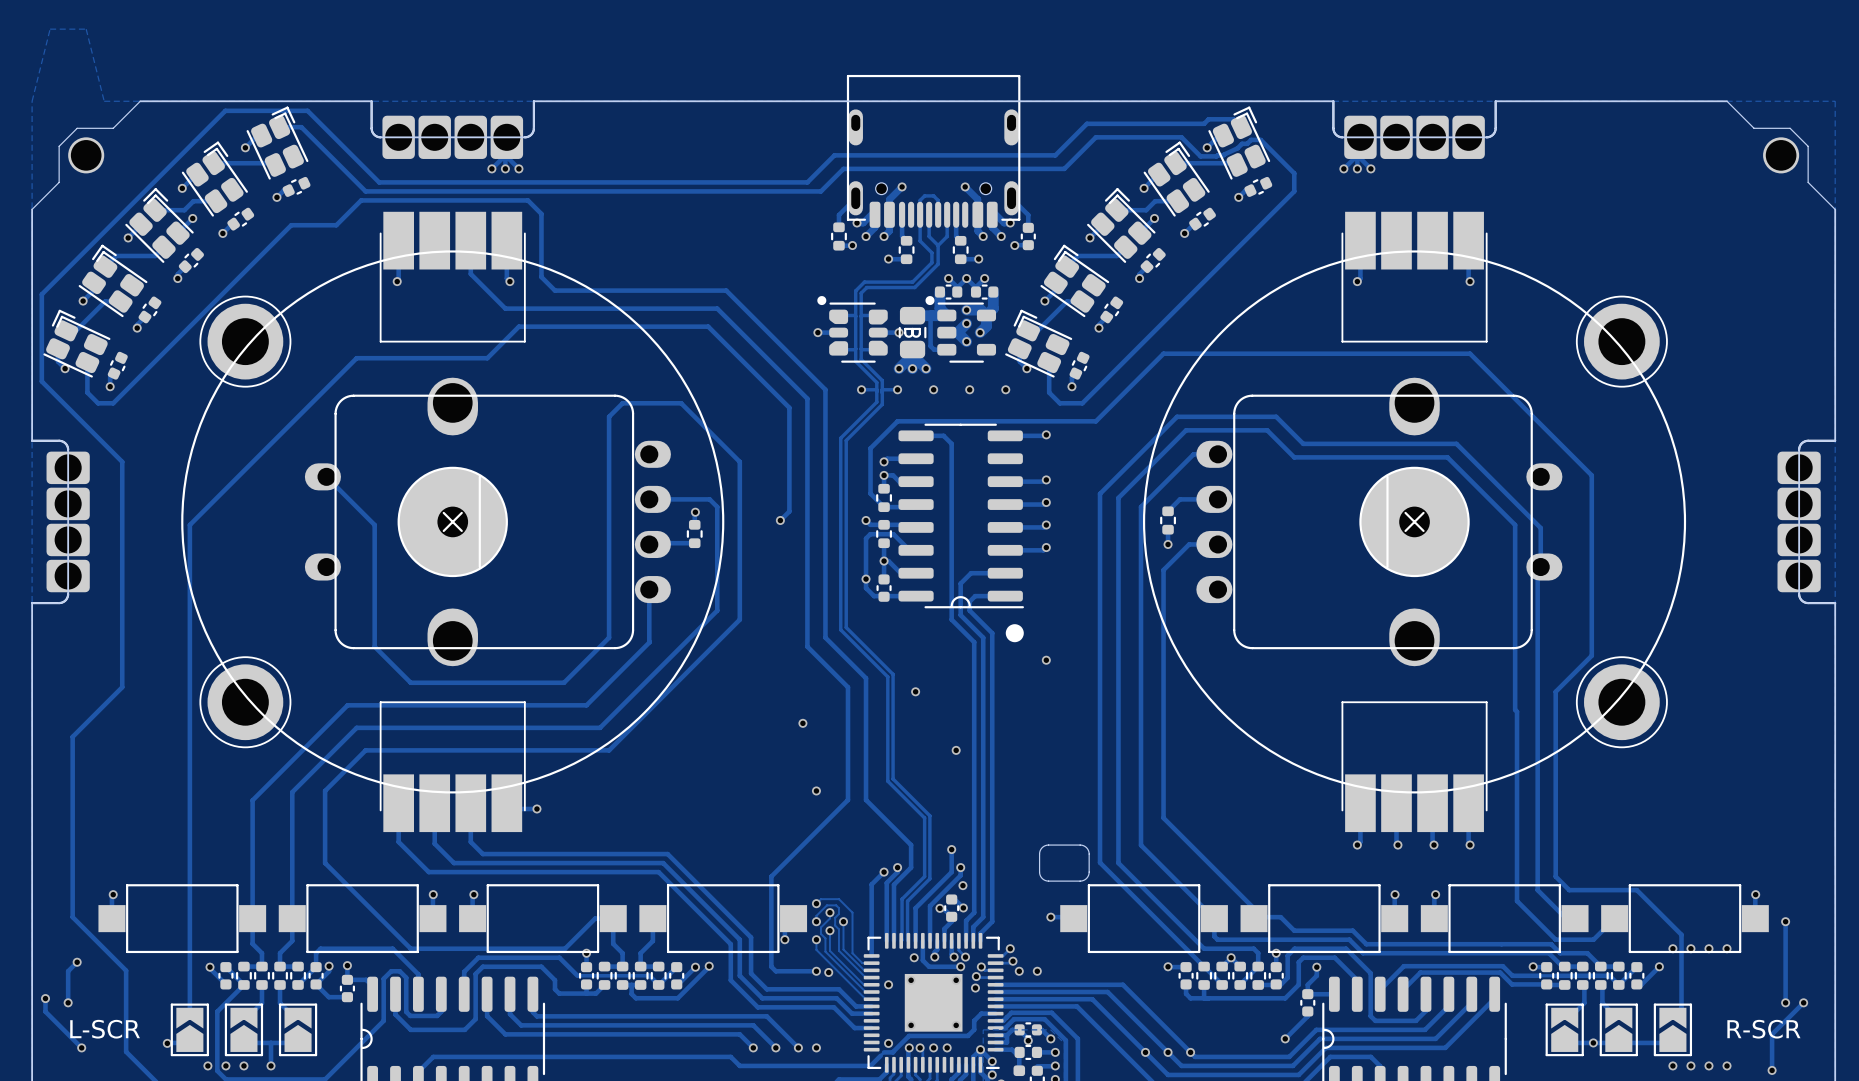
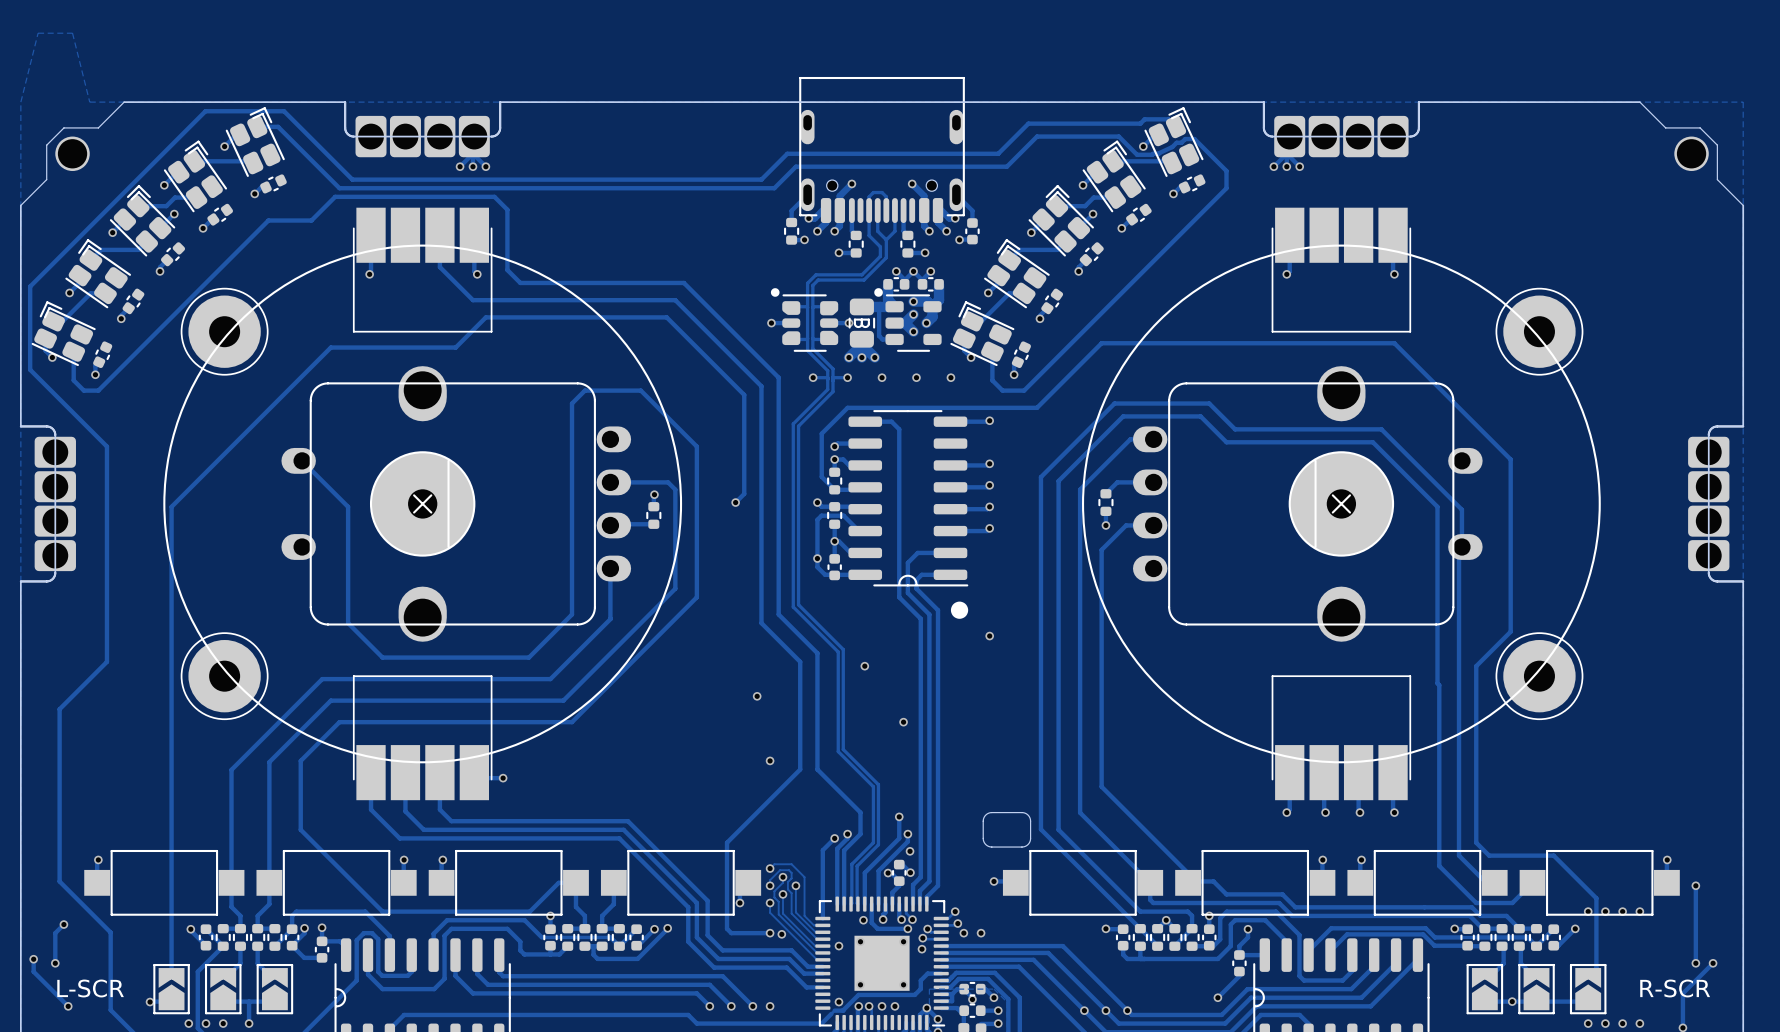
part footprint: [199, 295, 292, 388] -> [180, 287, 269, 376]
part footprint: [1575, 295, 1668, 388] -> [1495, 287, 1584, 376]
part footprint: [199, 656, 292, 749] -> [180, 632, 269, 721]
part footprint: [1575, 656, 1668, 749] -> [1495, 632, 1584, 721]

